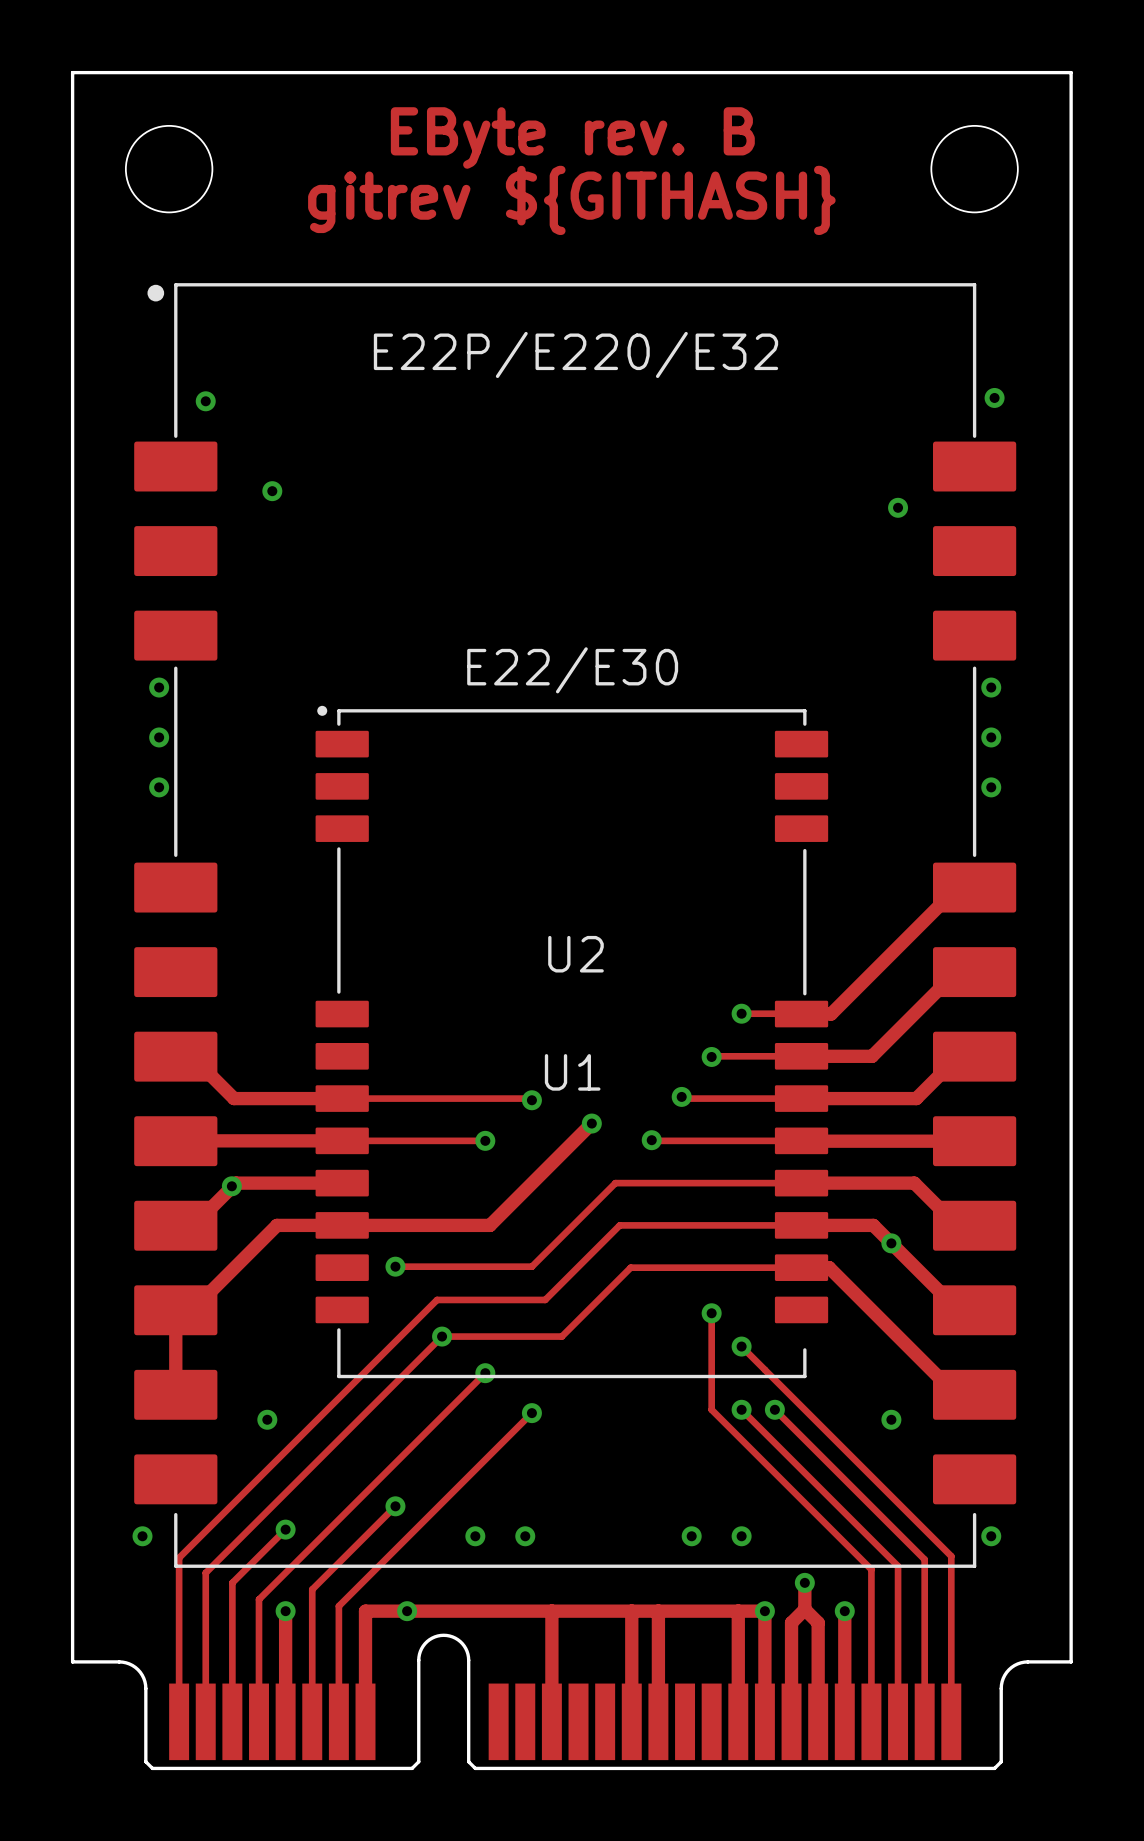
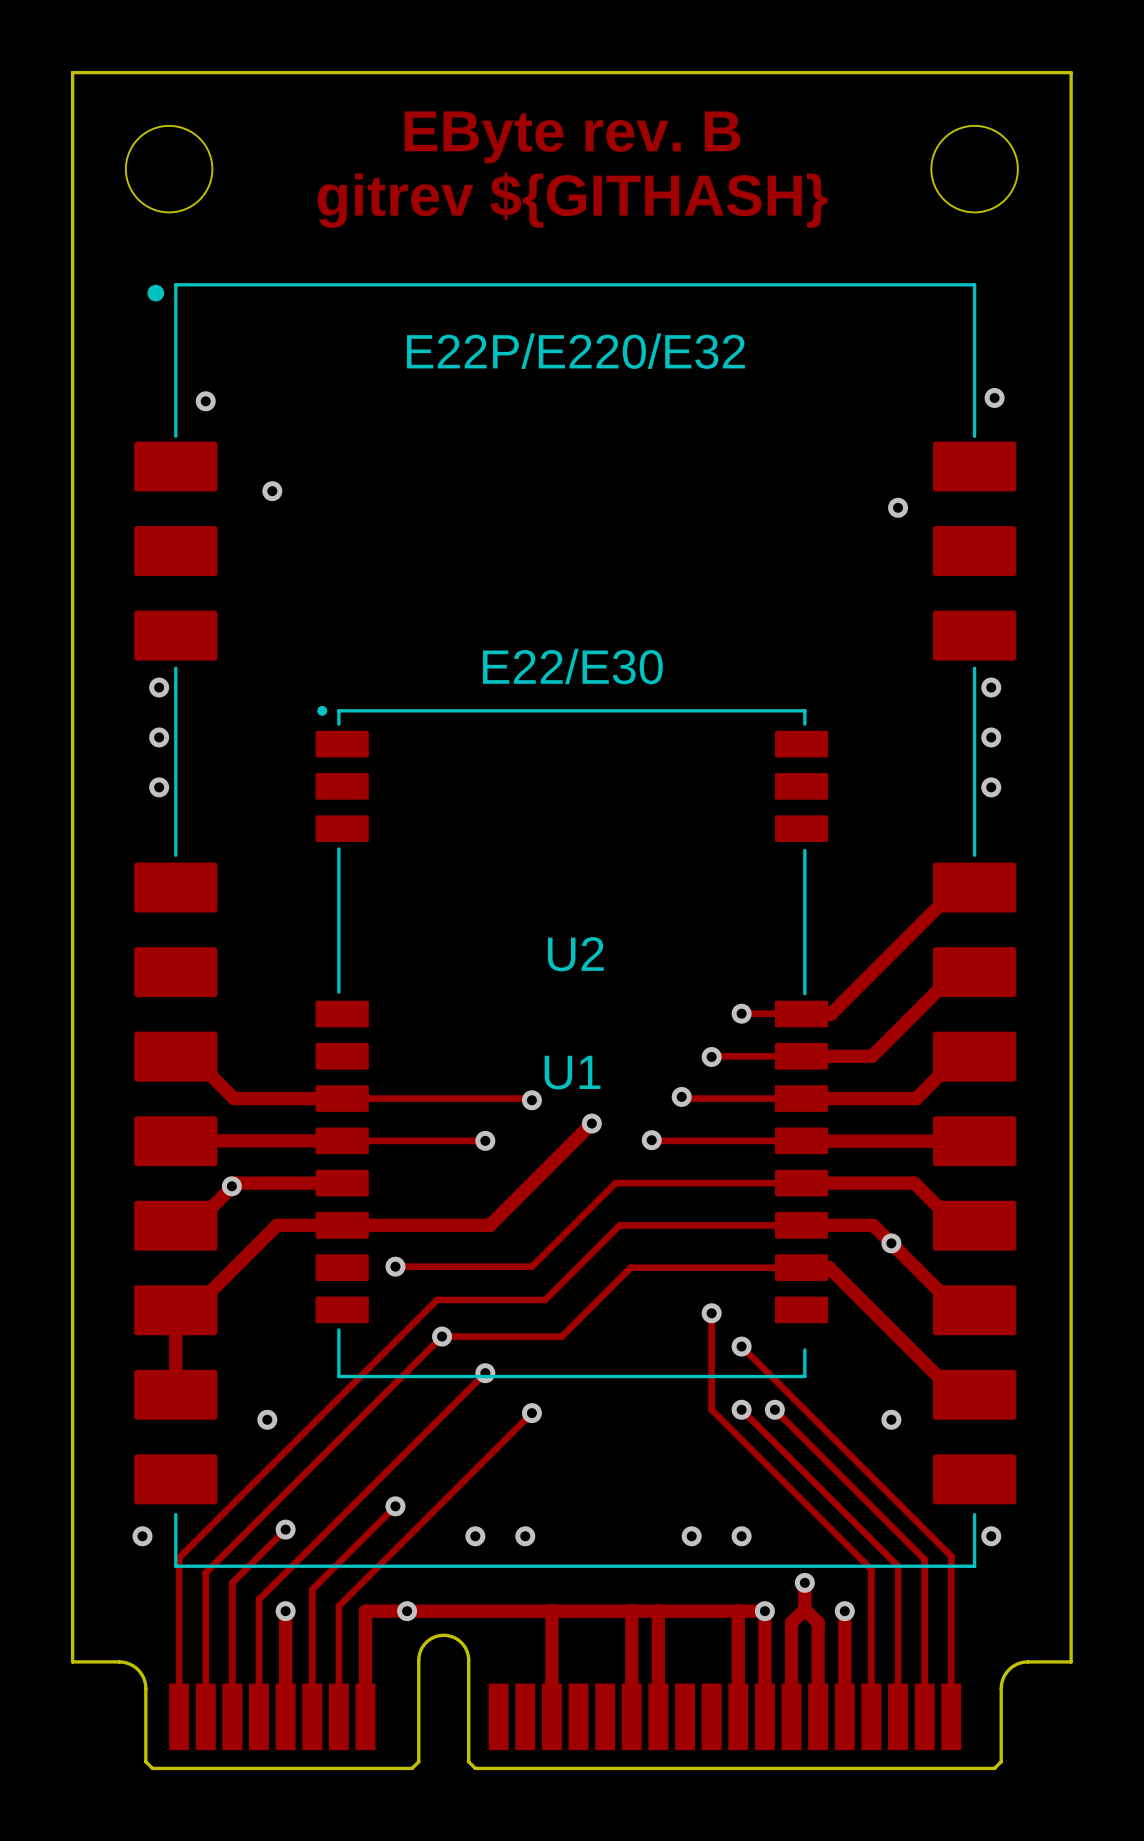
part footprint: [70, 70, 1073, 1771] -> [70, 70, 1073, 1771]

